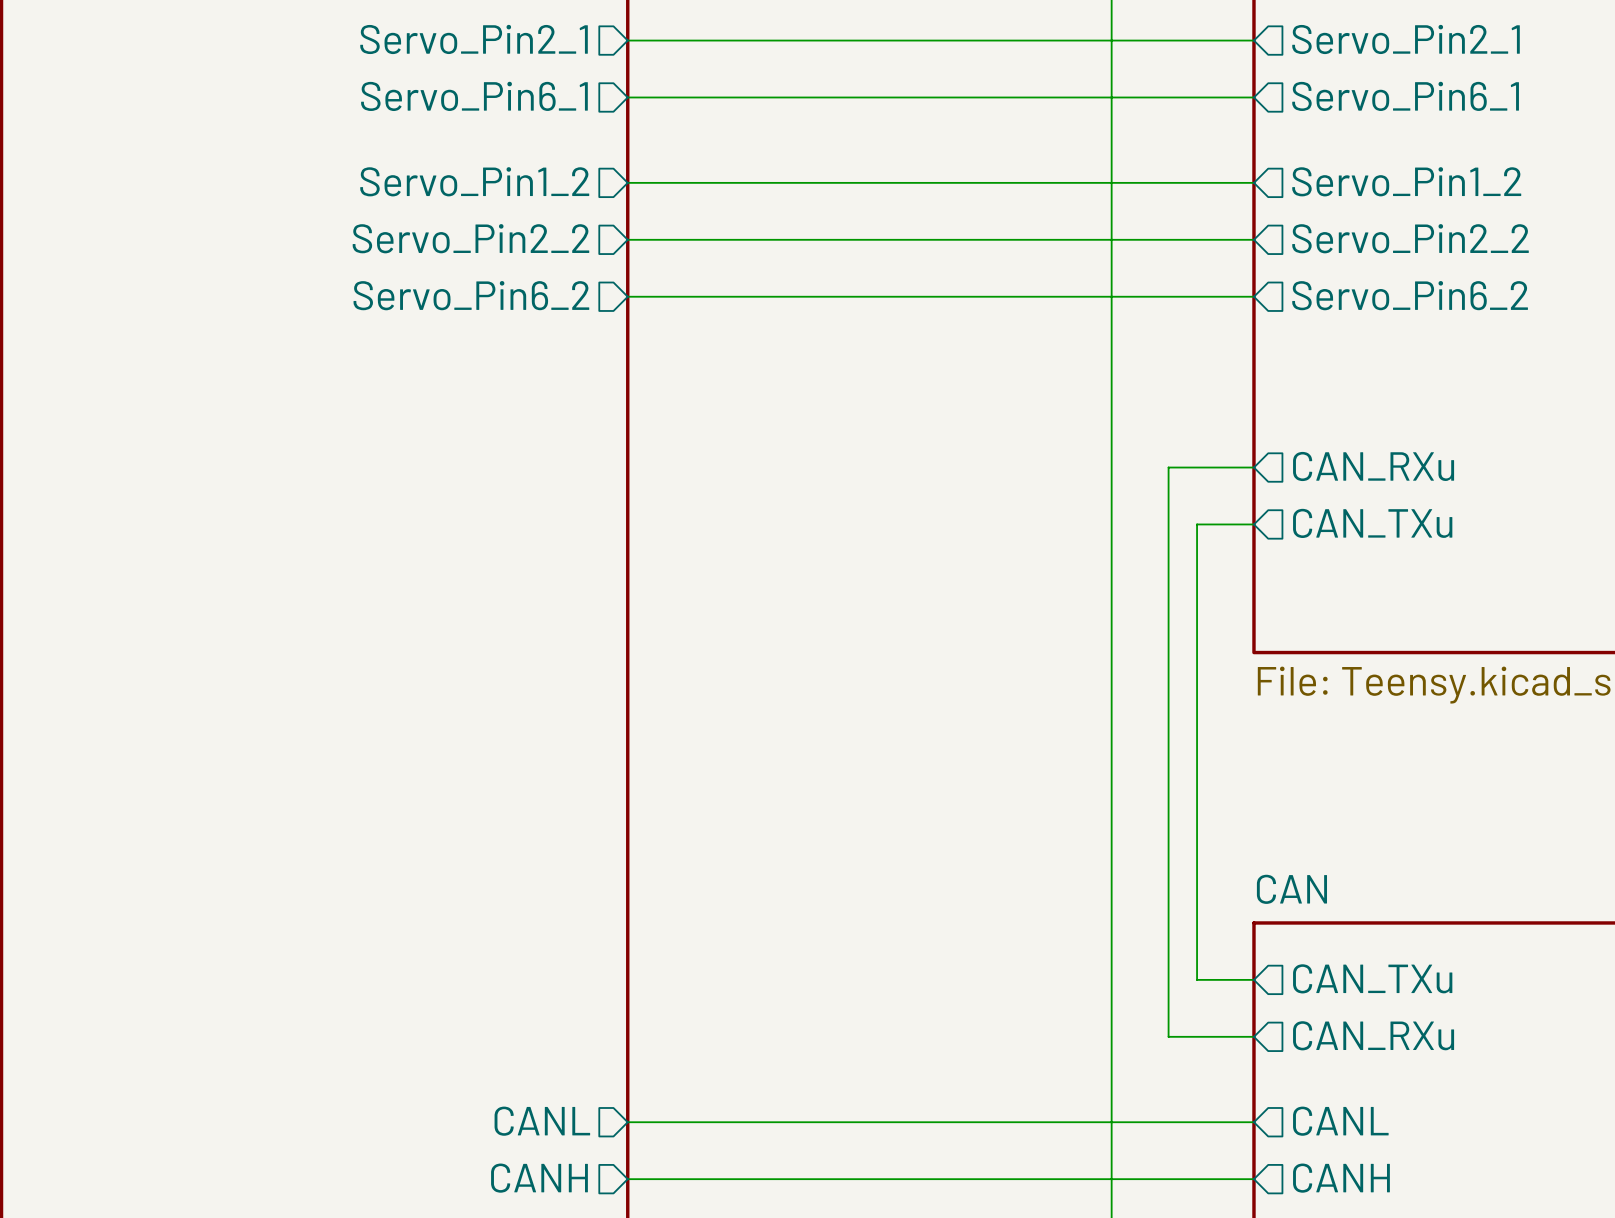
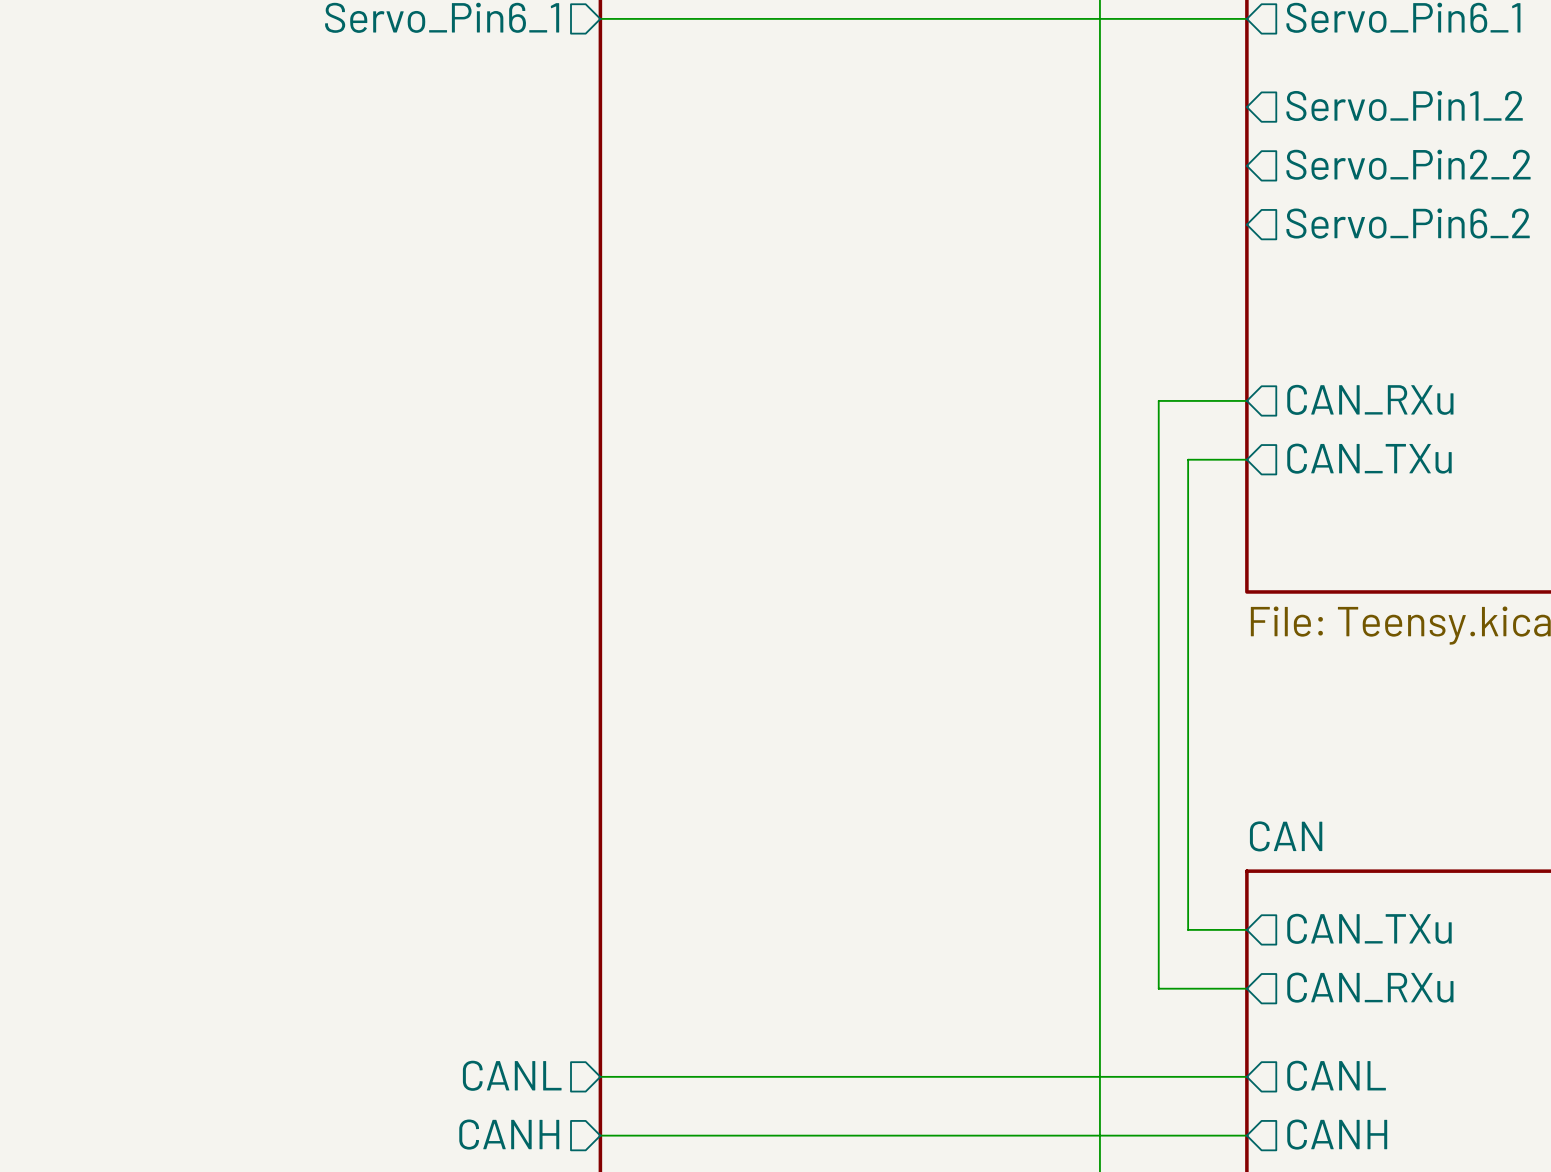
sheet pin: Servo_Pin1_2 (474, 181) -> none
wire: (627, 182) (1253, 182) -> none
sheet pin: Servo_Pin2_2 (470, 238) -> none
wire: (627, 239) (1253, 239) -> none
sheet pin: Servo_Pin6_2 (471, 295) -> none
wire: (627, 296) (1253, 296) -> none

